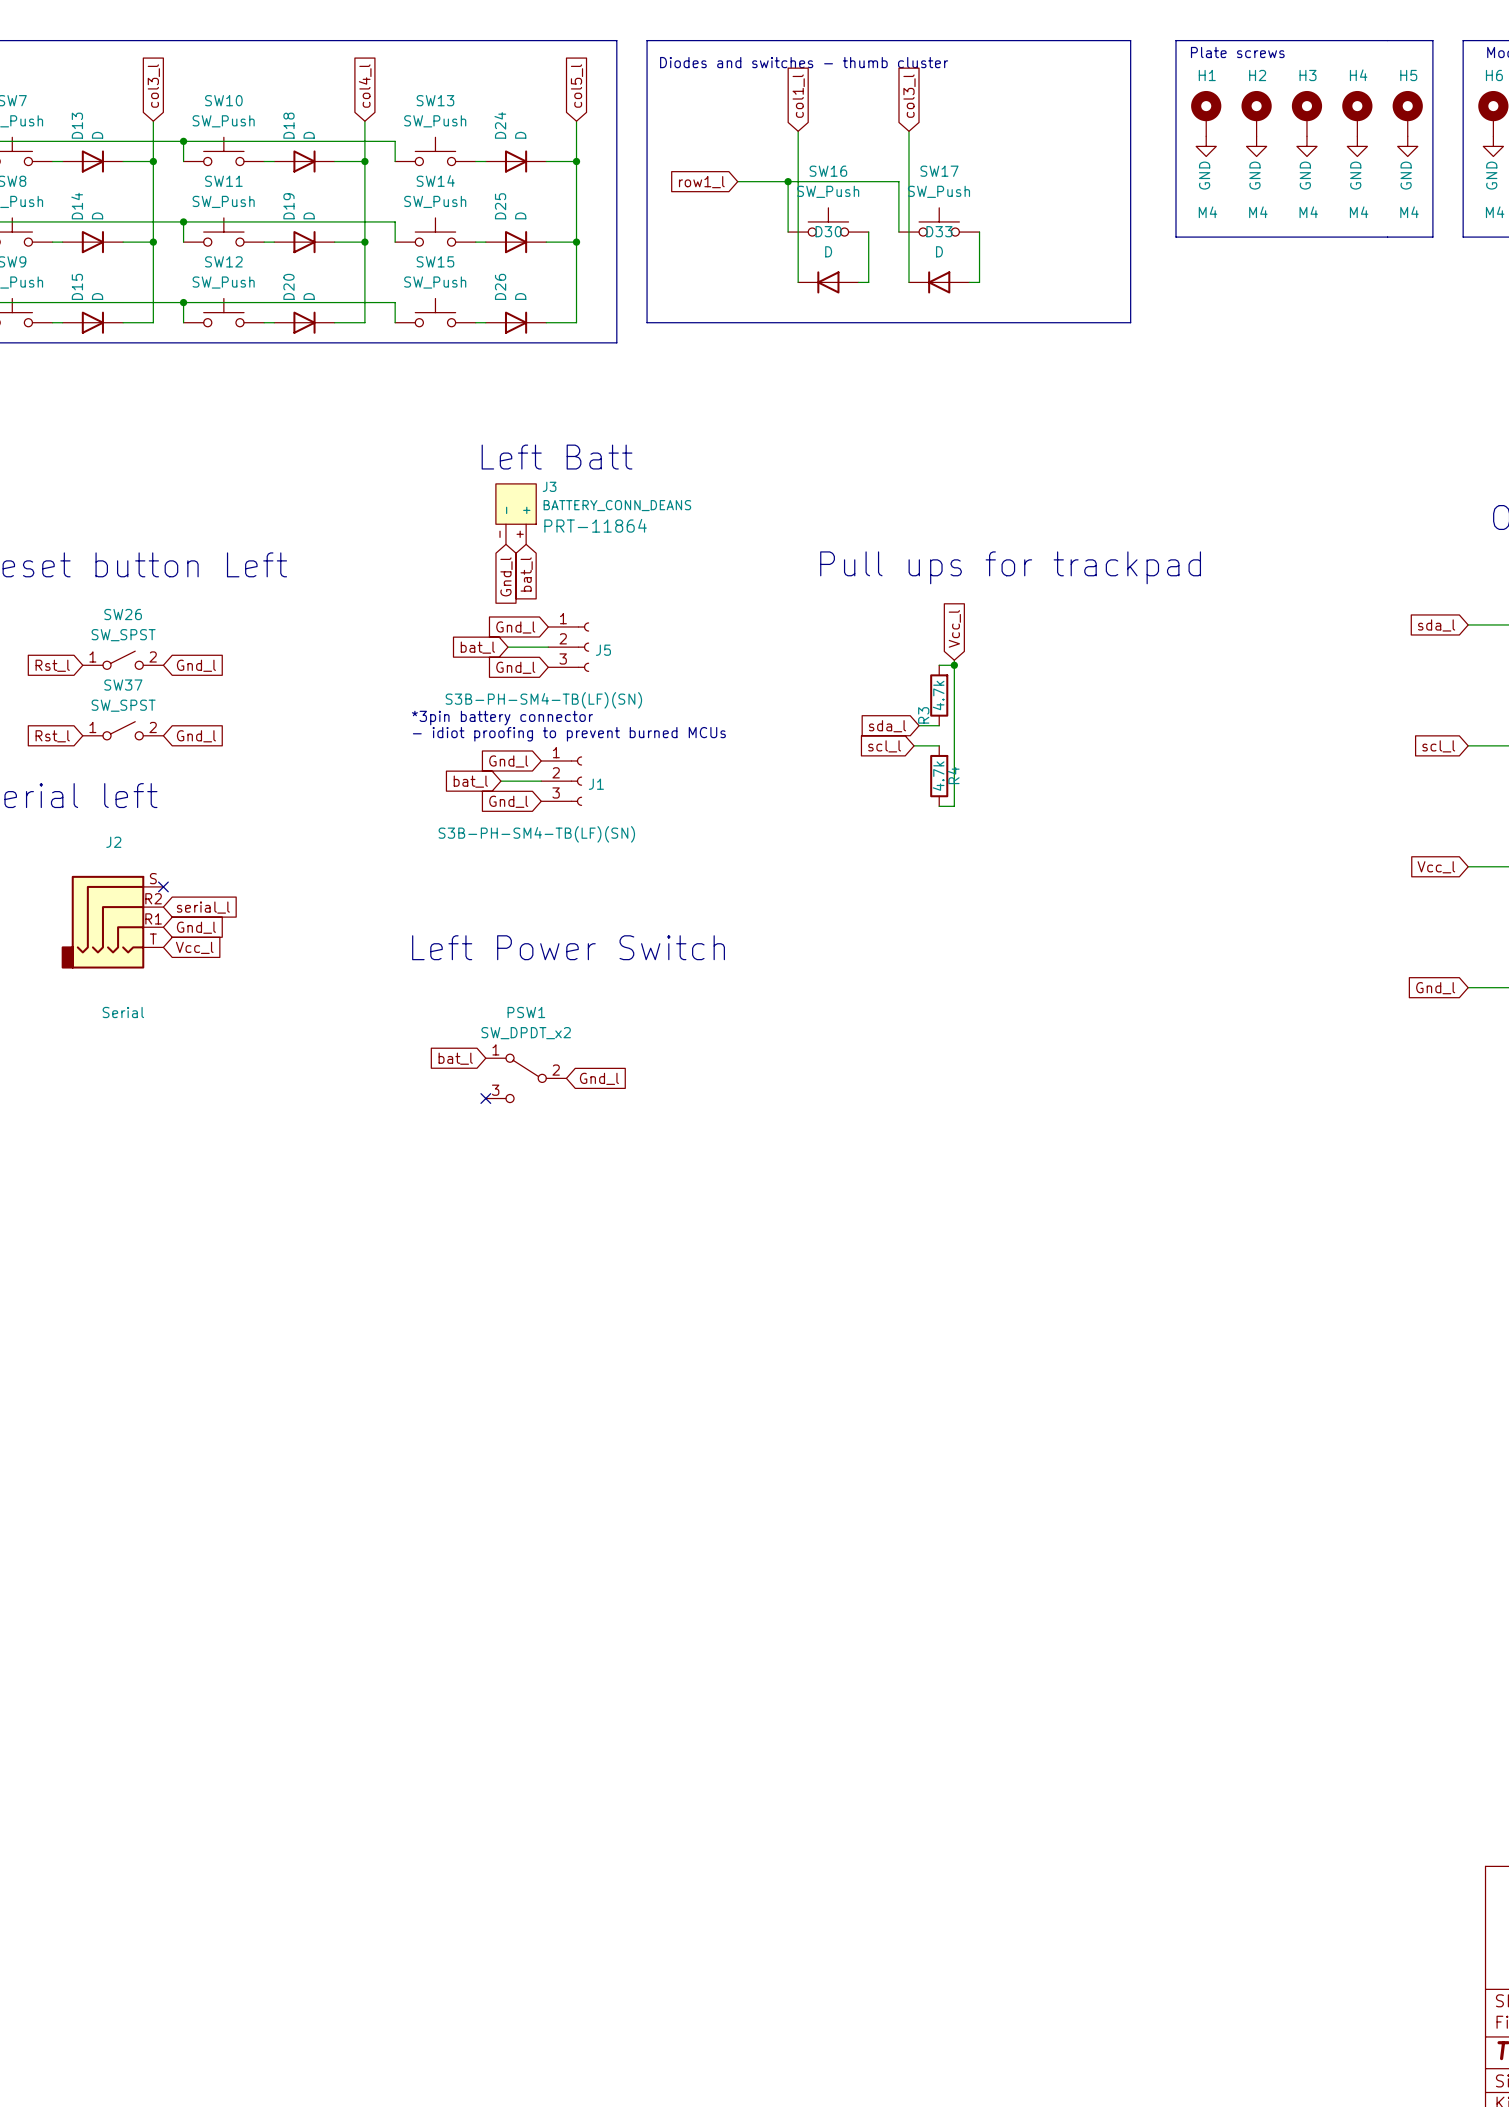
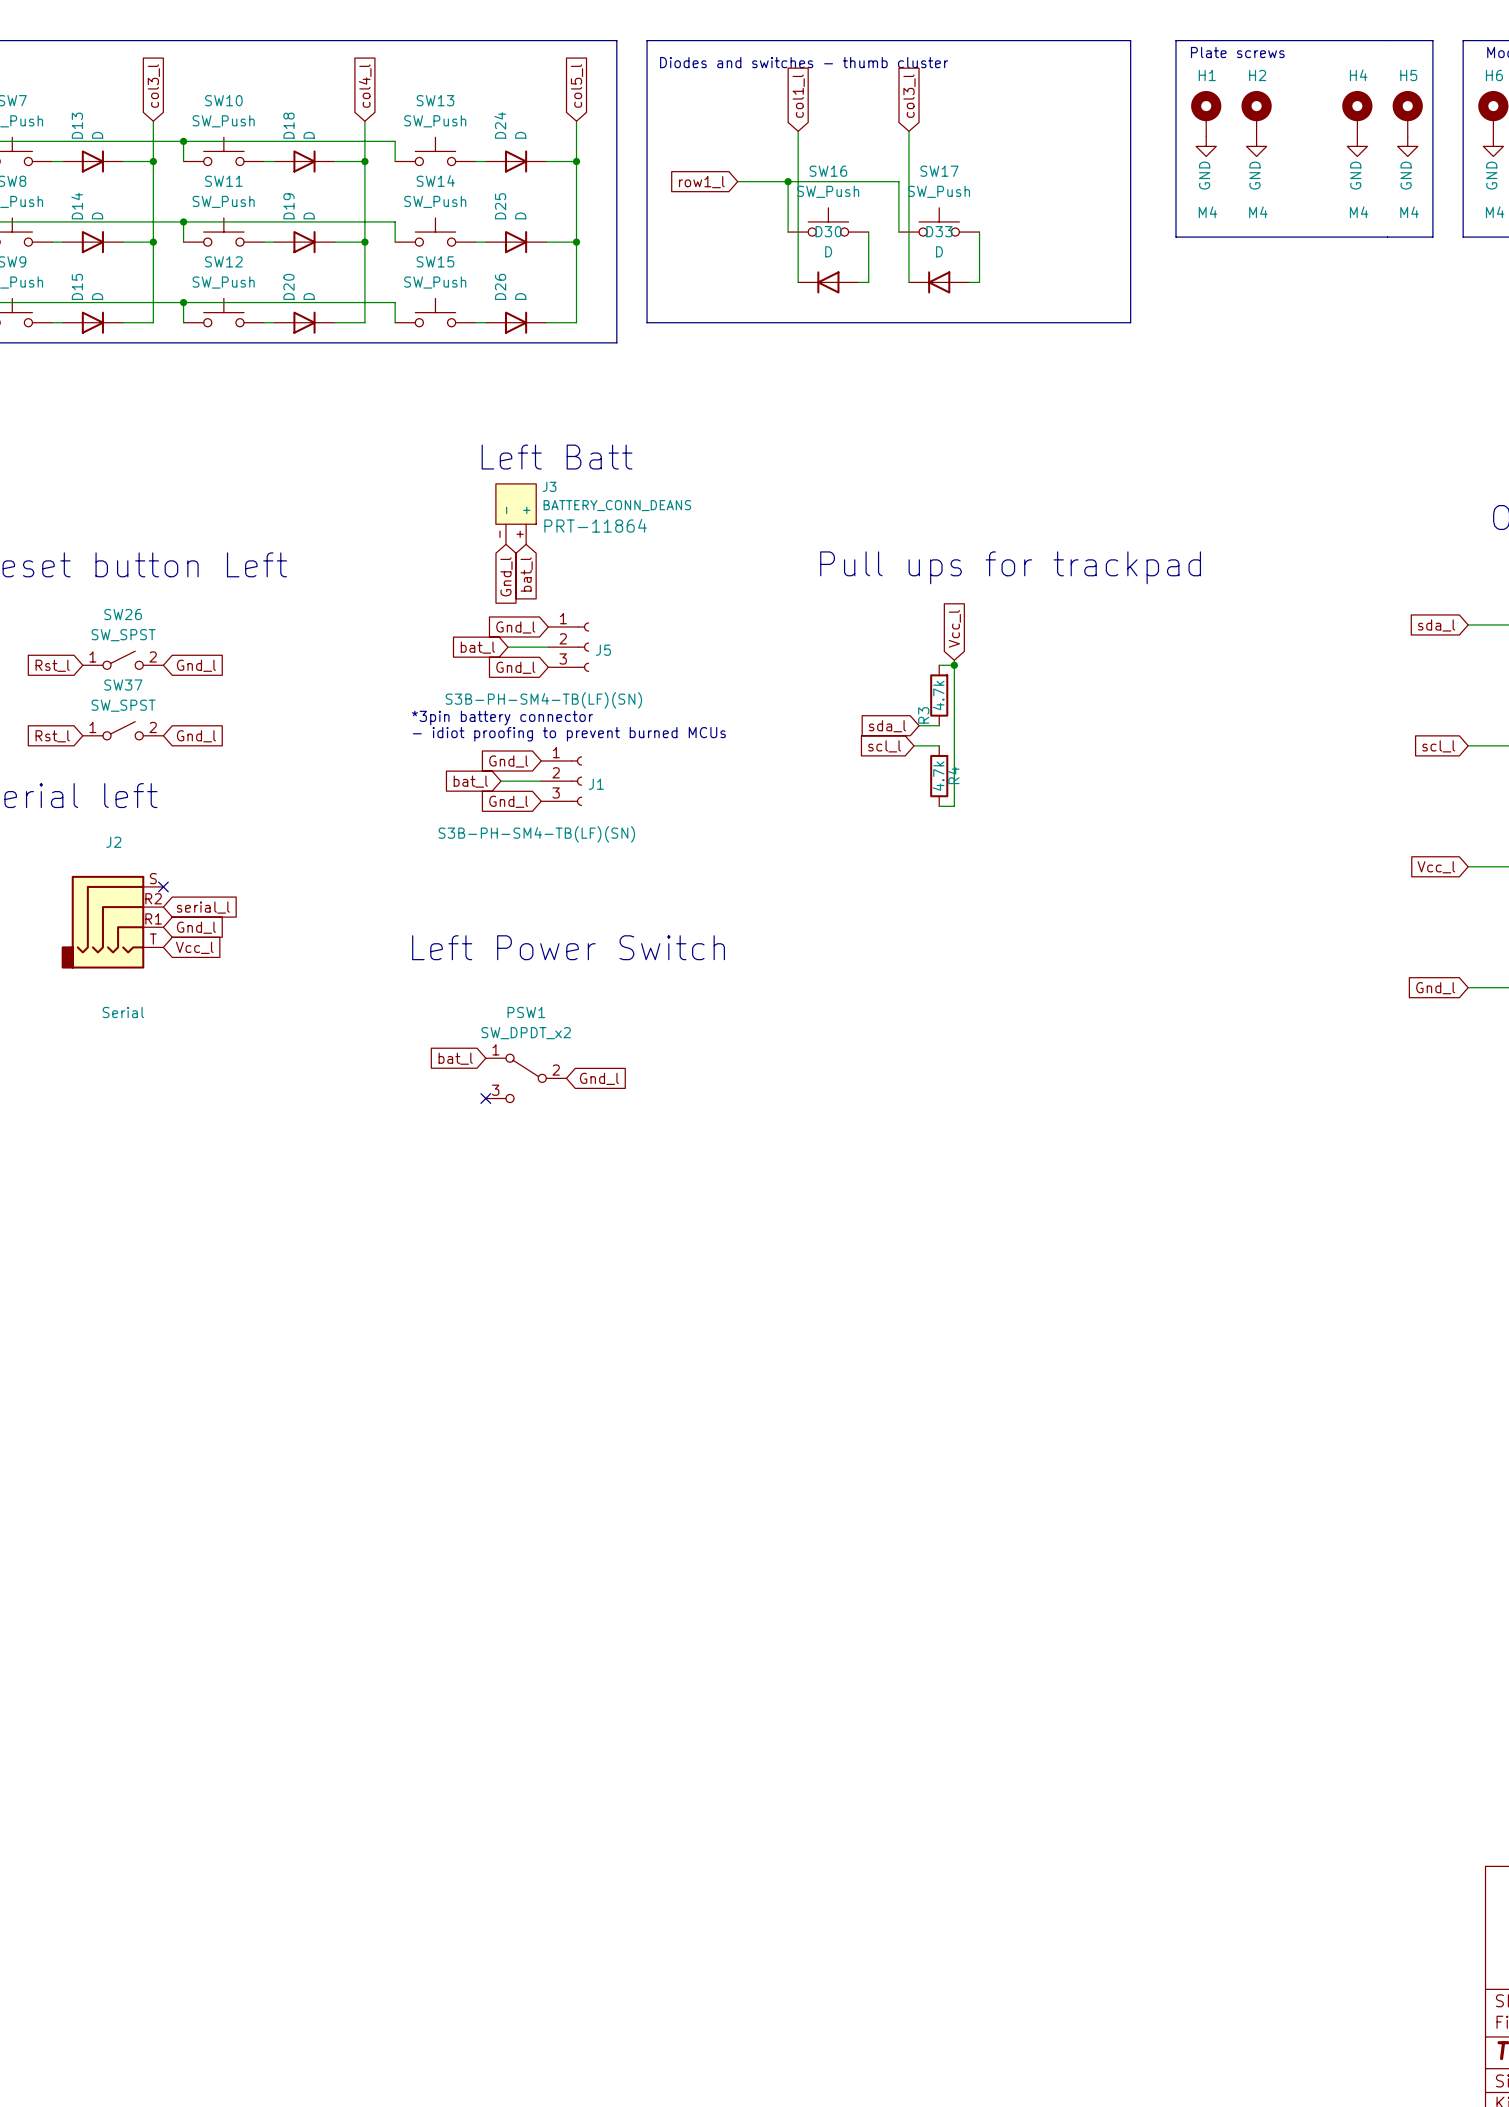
H3: M4 (1306, 113) -> none
power symbol: GND (1306, 146) -> none

